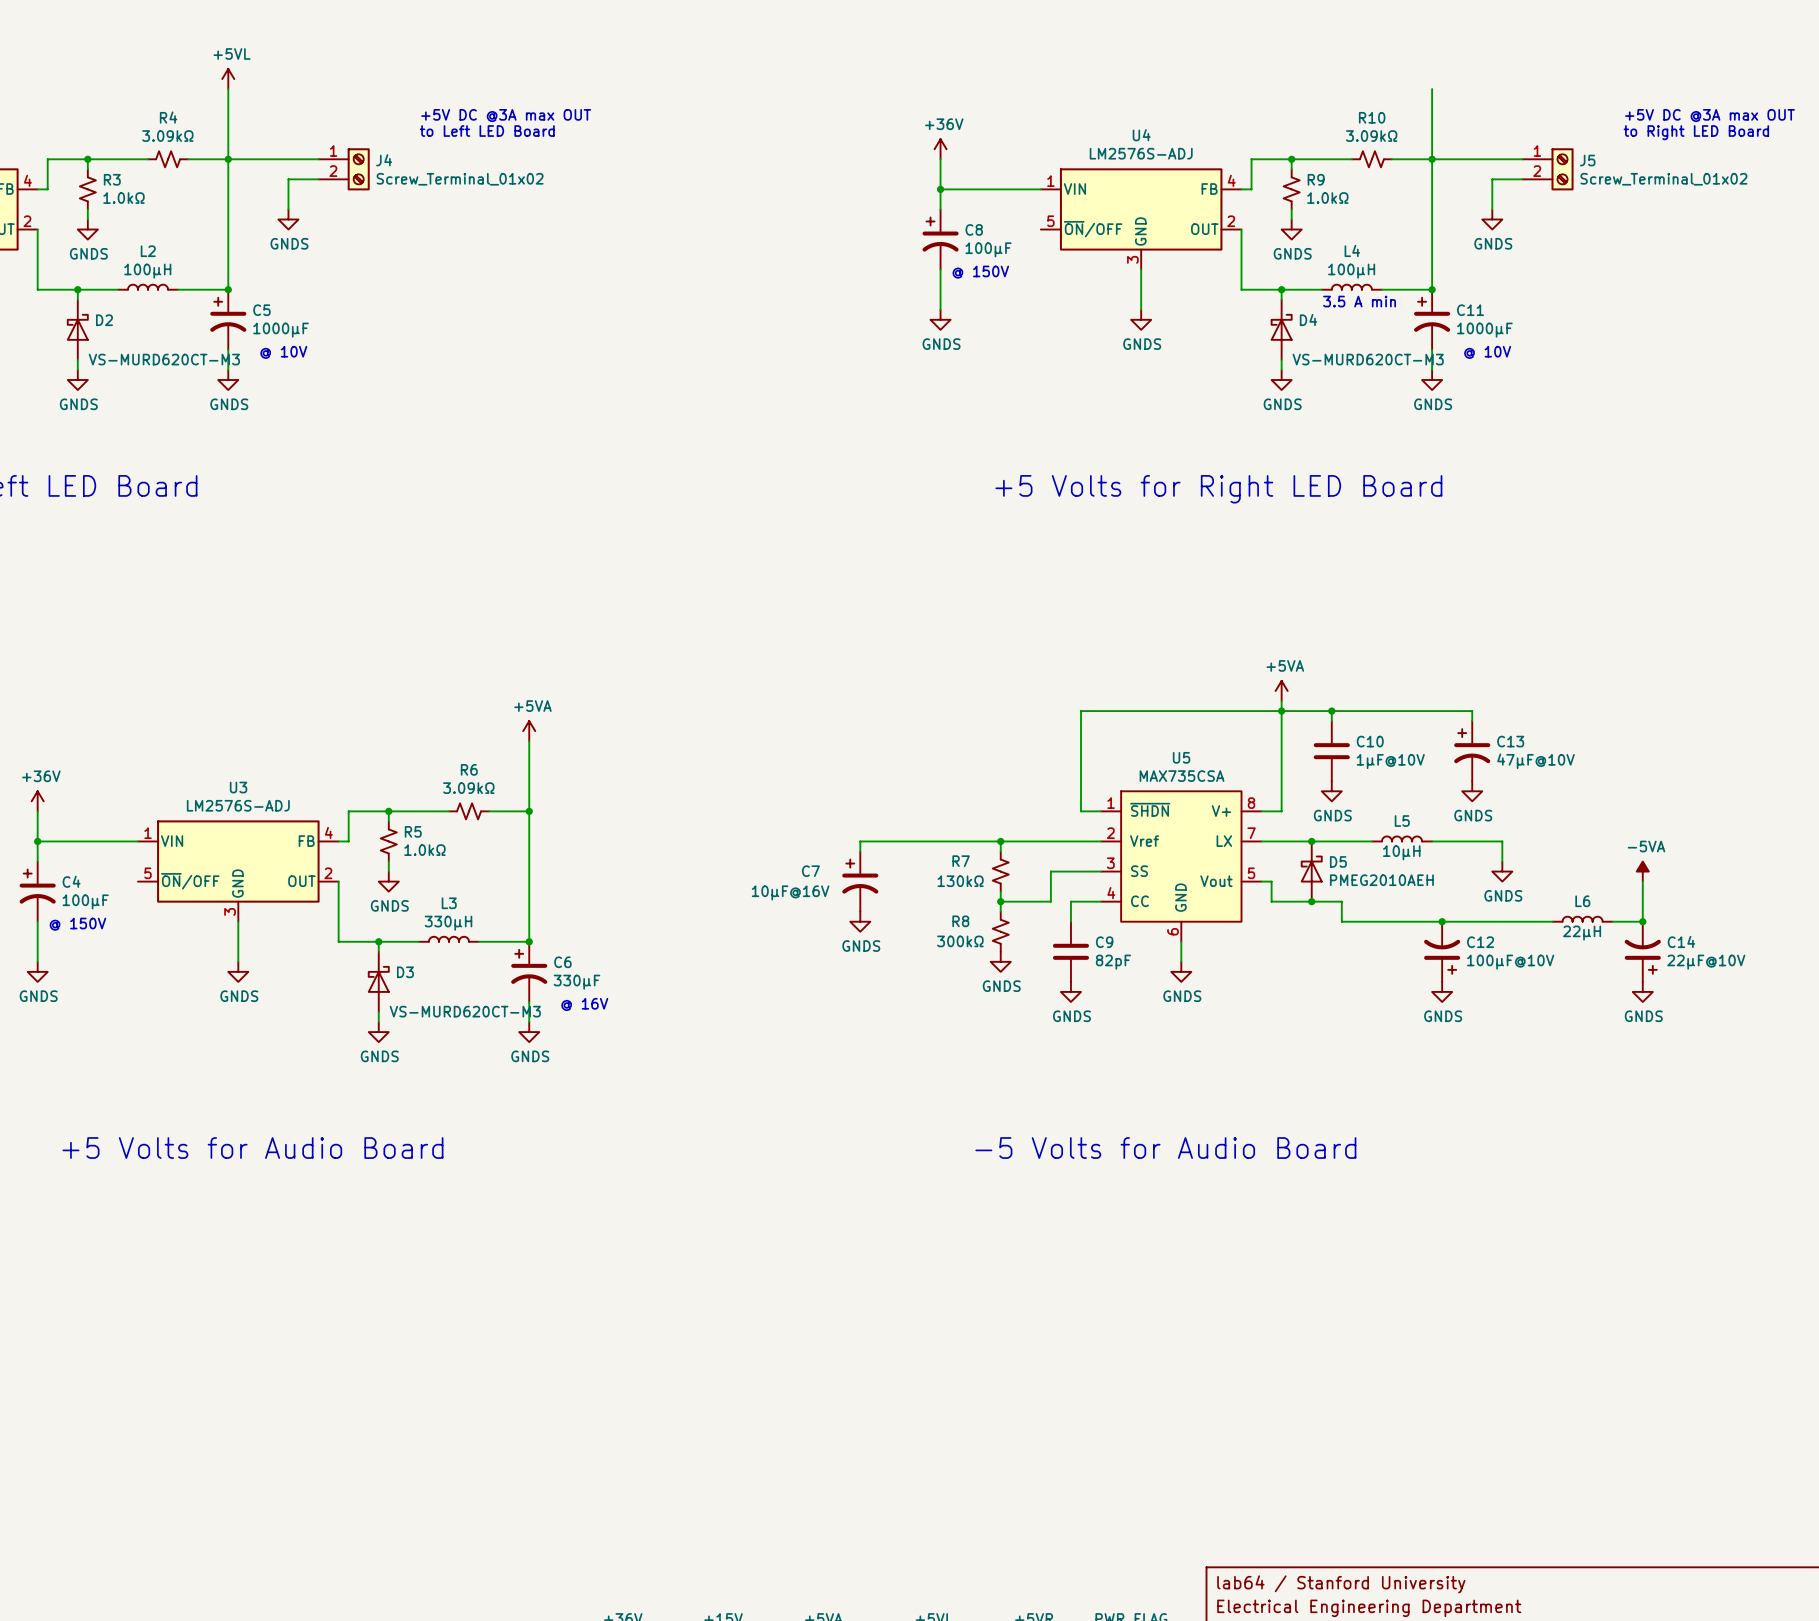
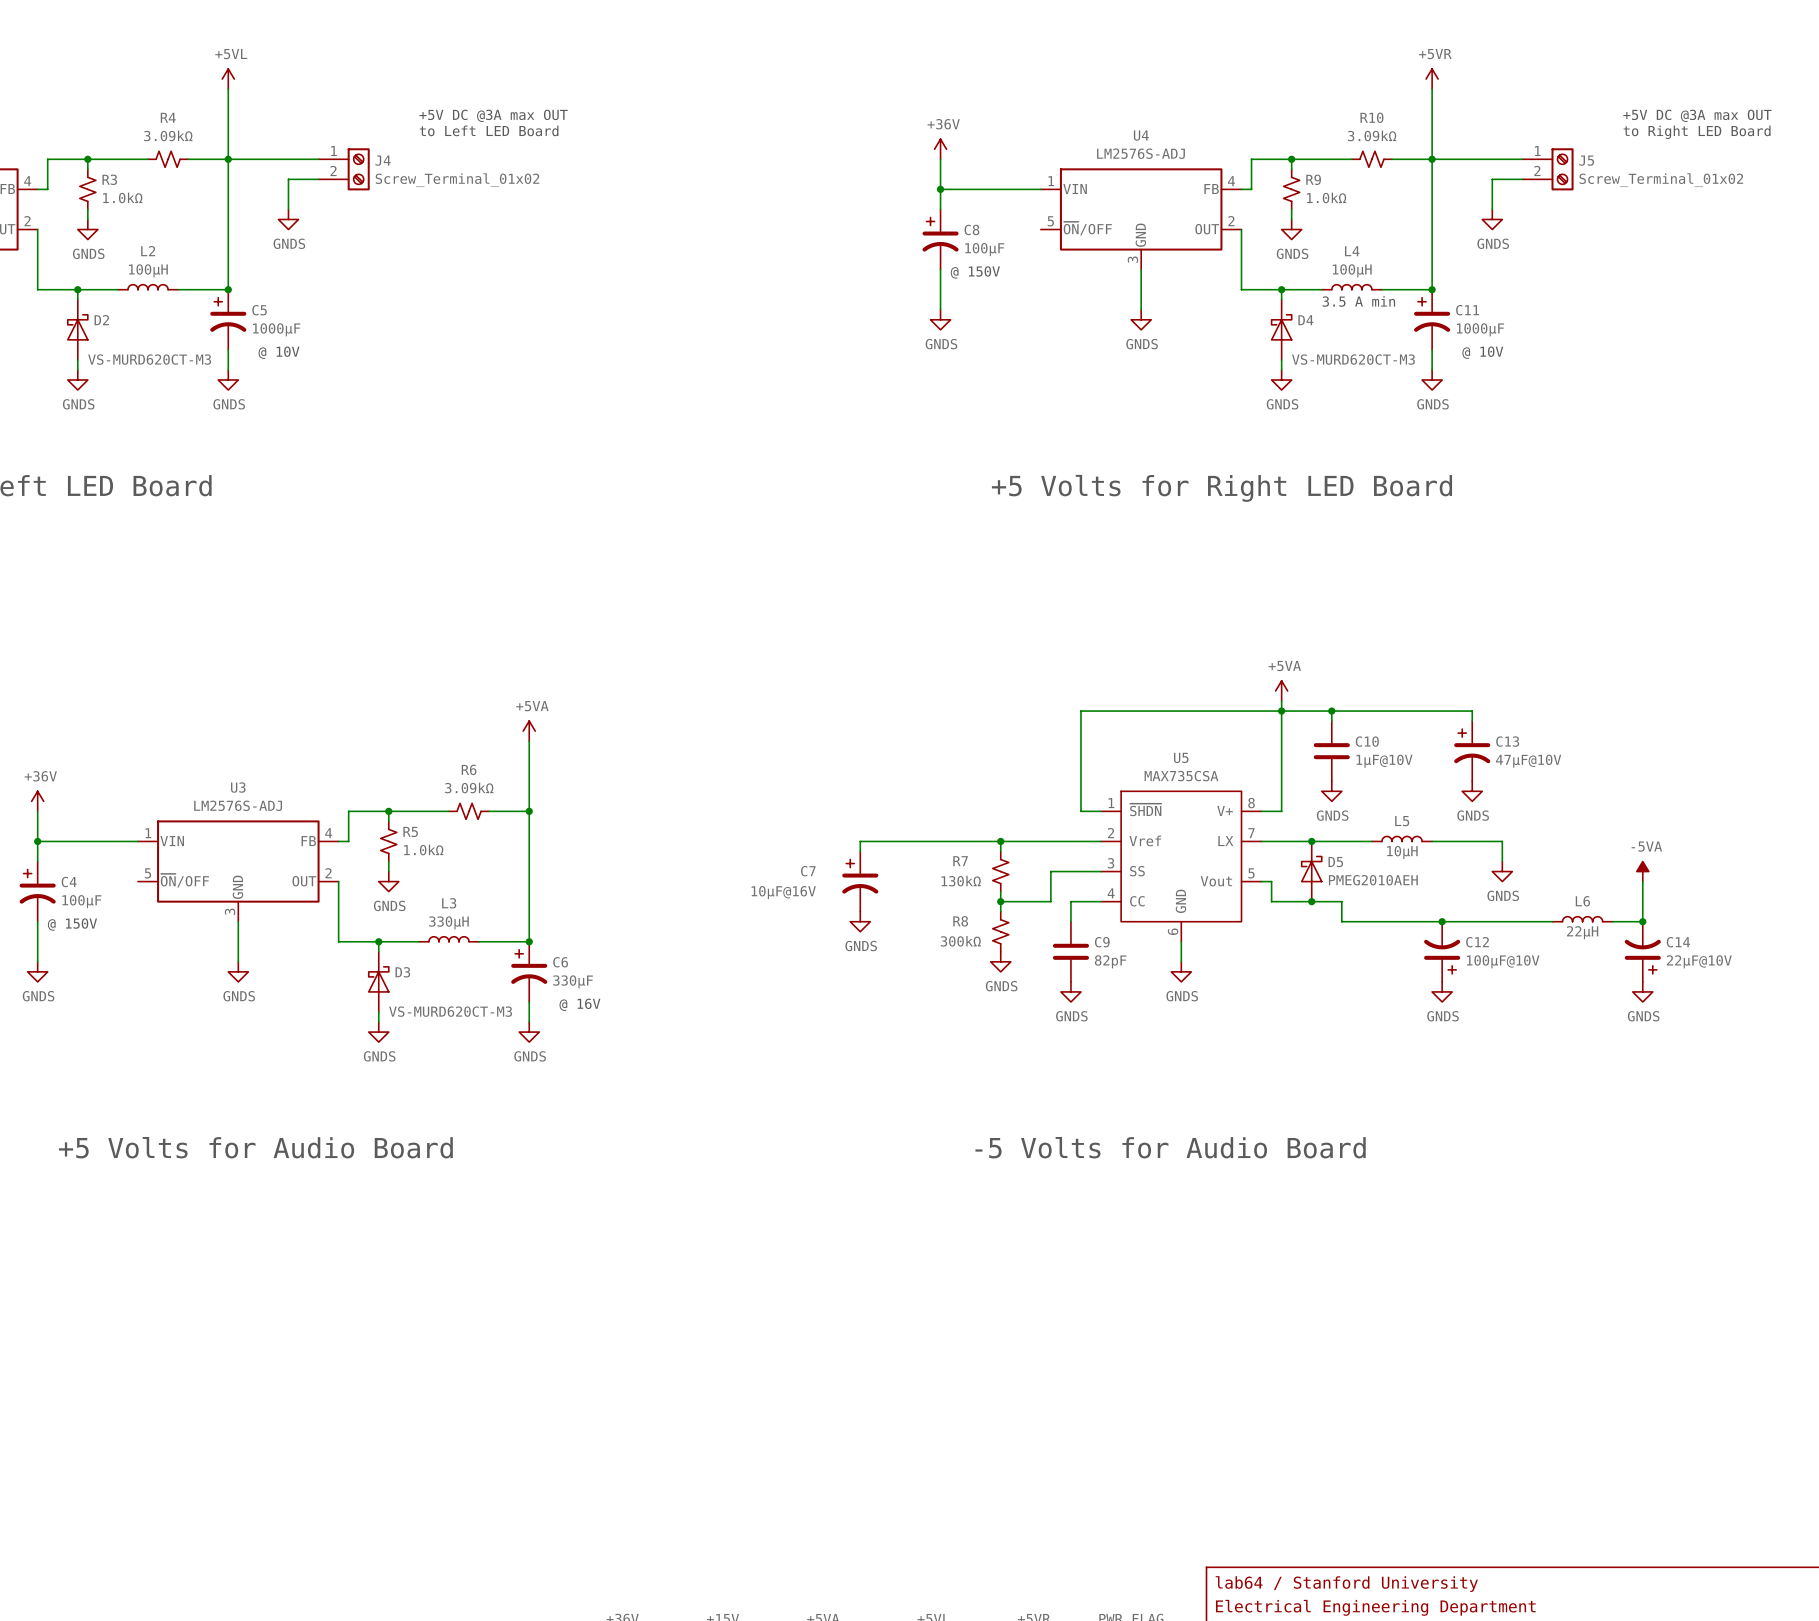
power symbol: none -> +5VR (1432, 79)

